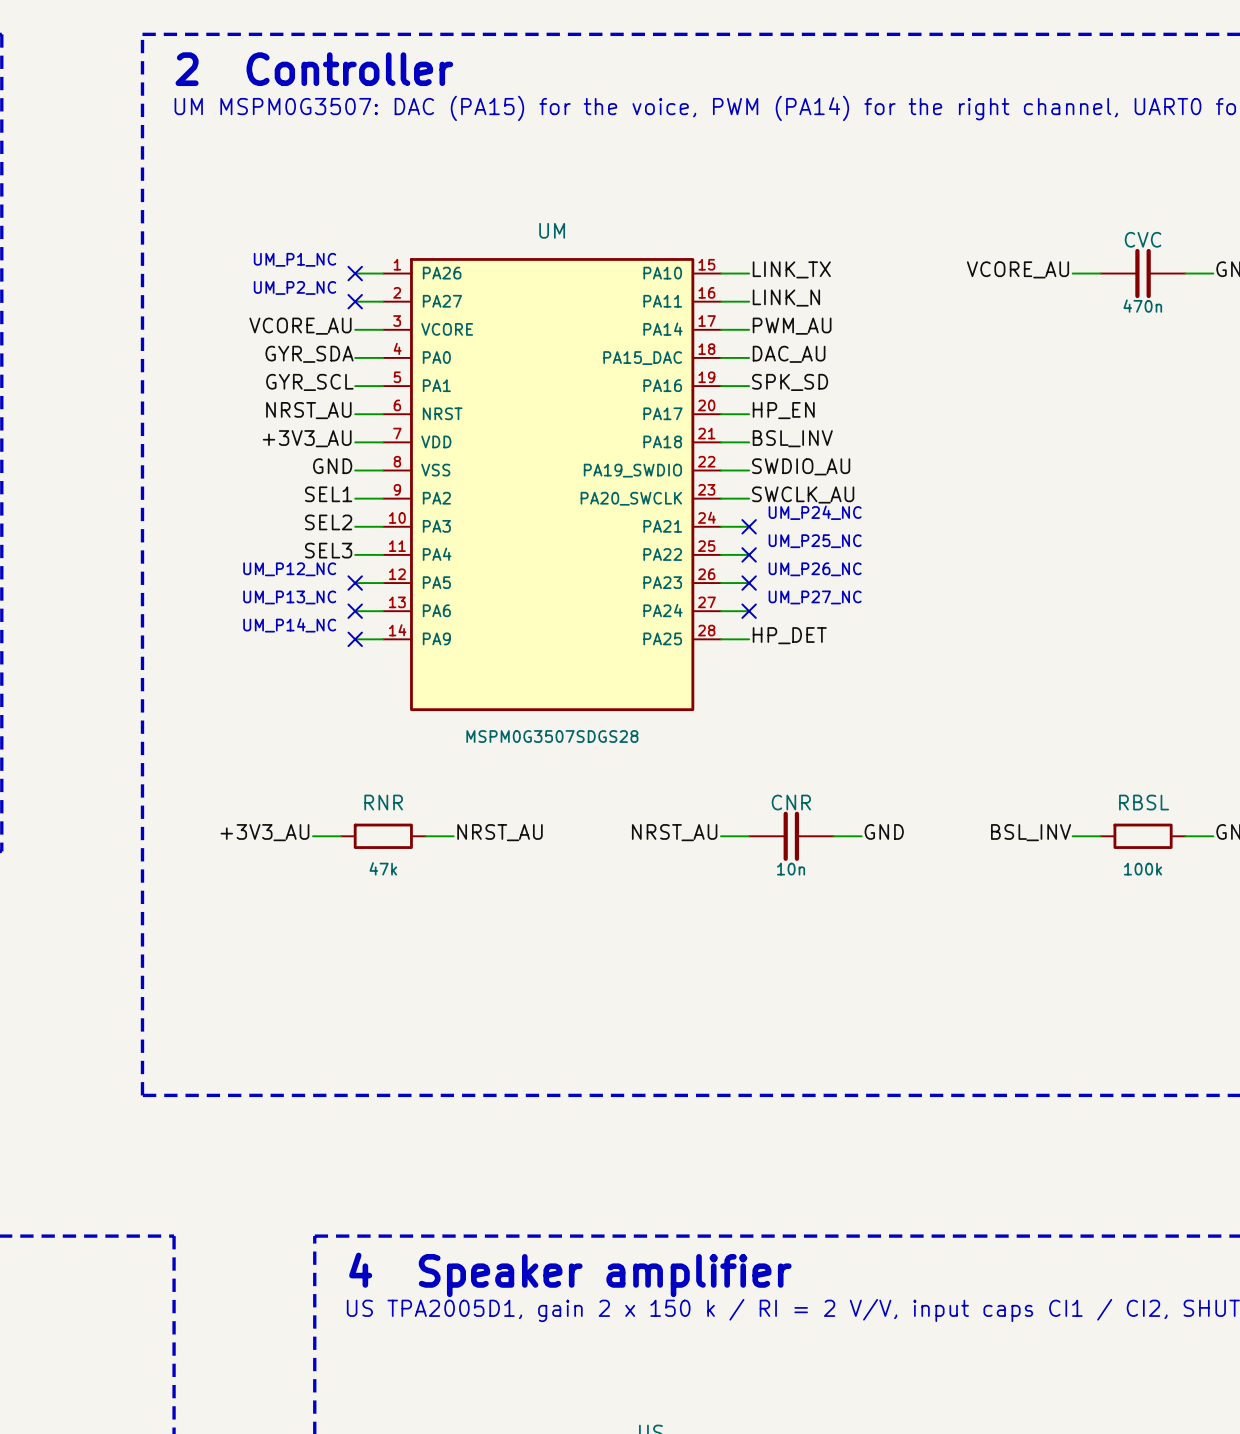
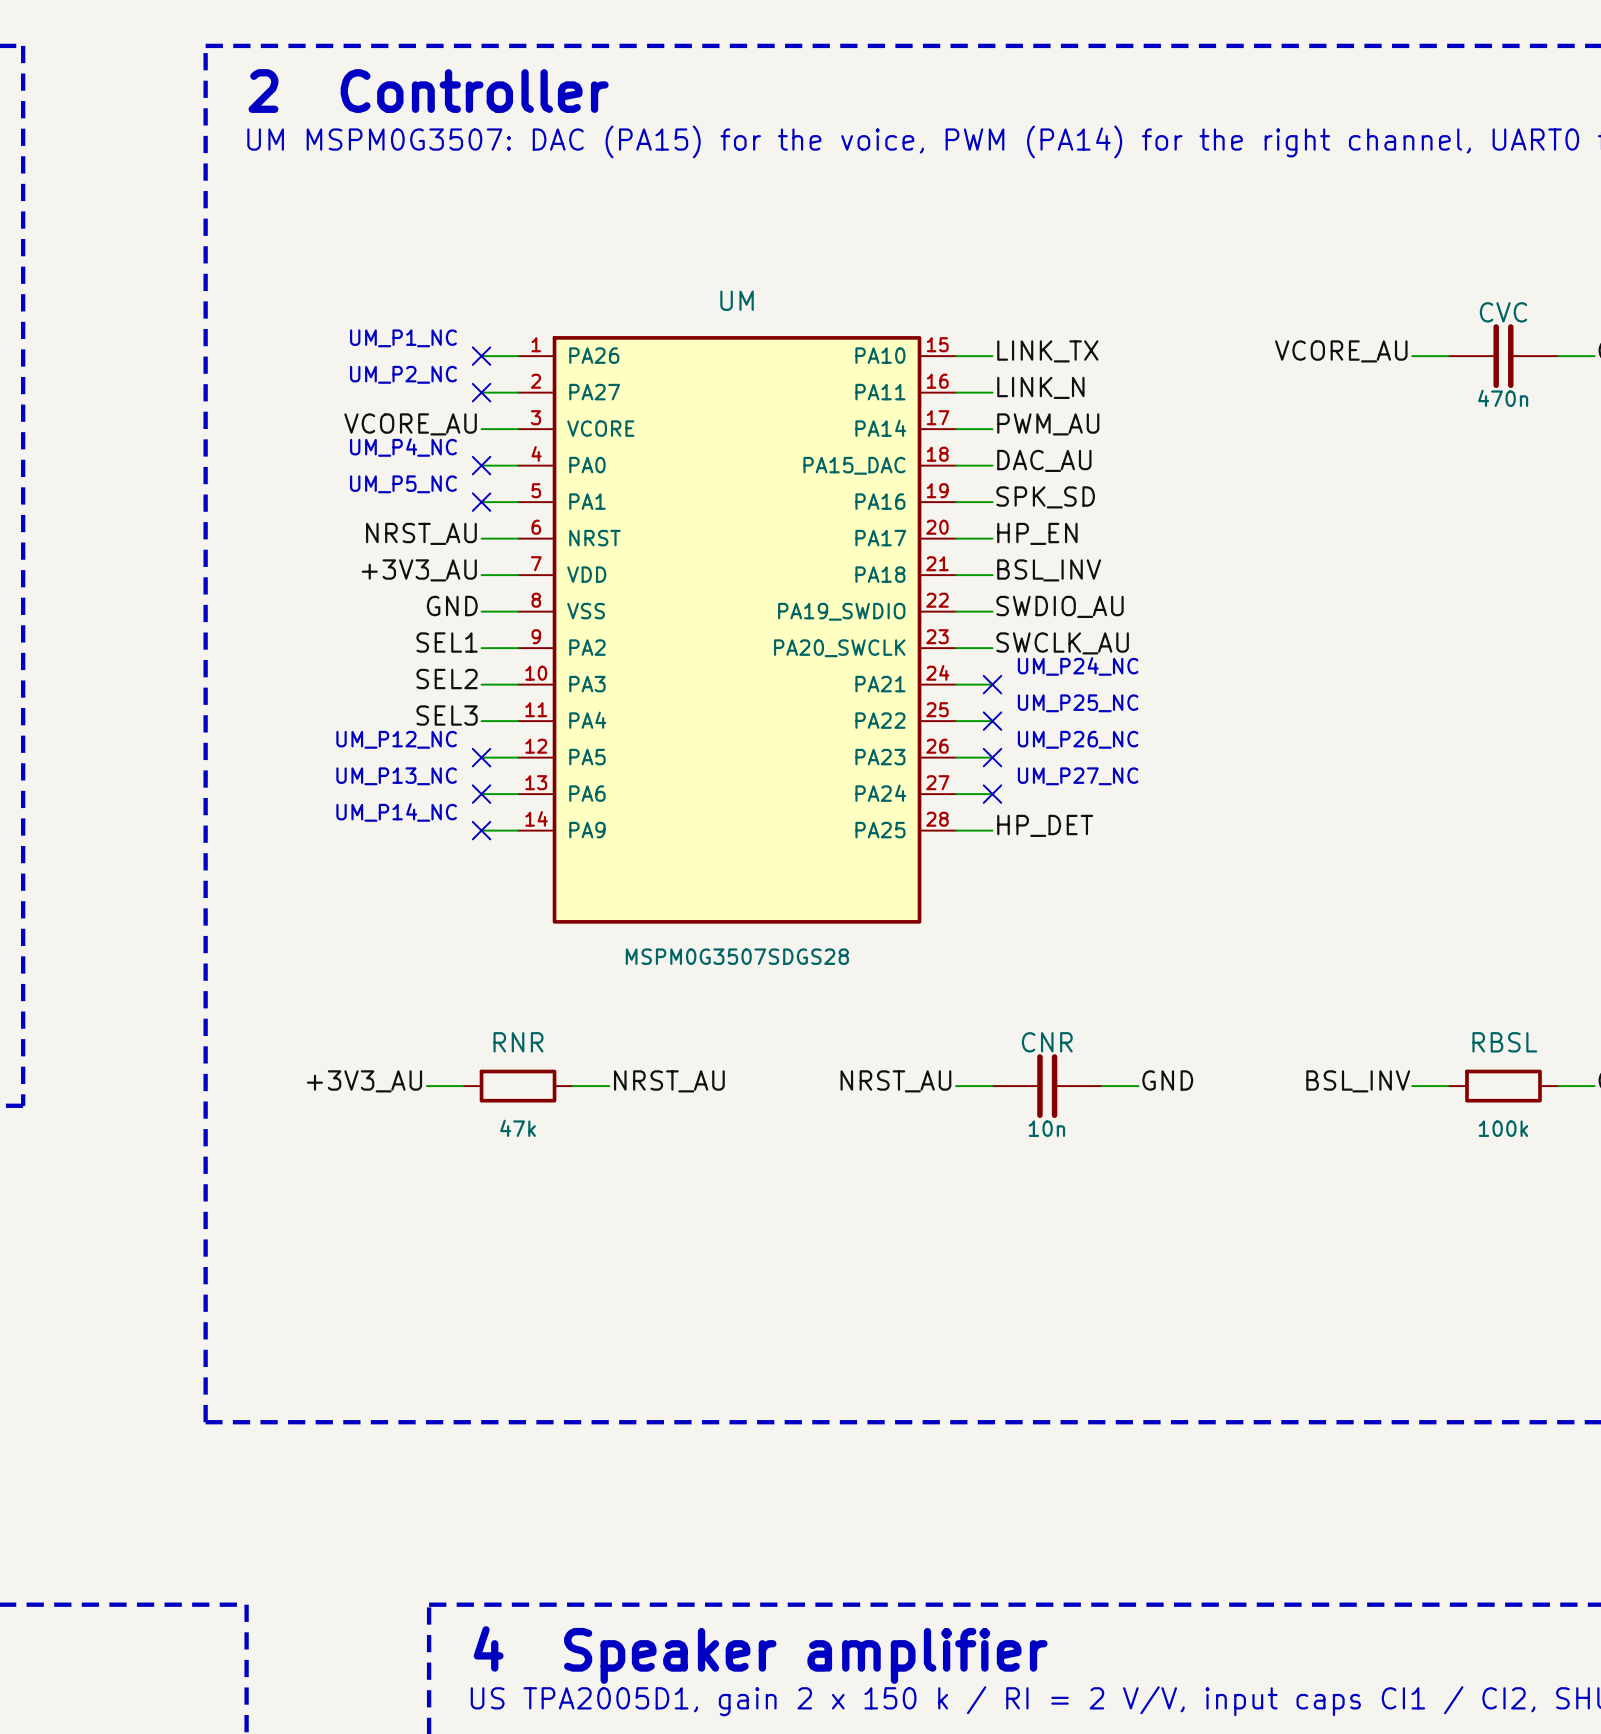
text: none -> UM_P4_NC (403, 447)
label: GYR_SDA (309, 354) -> none
no-connect mark: none -> (481, 465)
text: none -> UM_P5_NC (403, 484)
label: GYR_SCL (309, 382) -> none
no-connect mark: none -> (481, 502)

